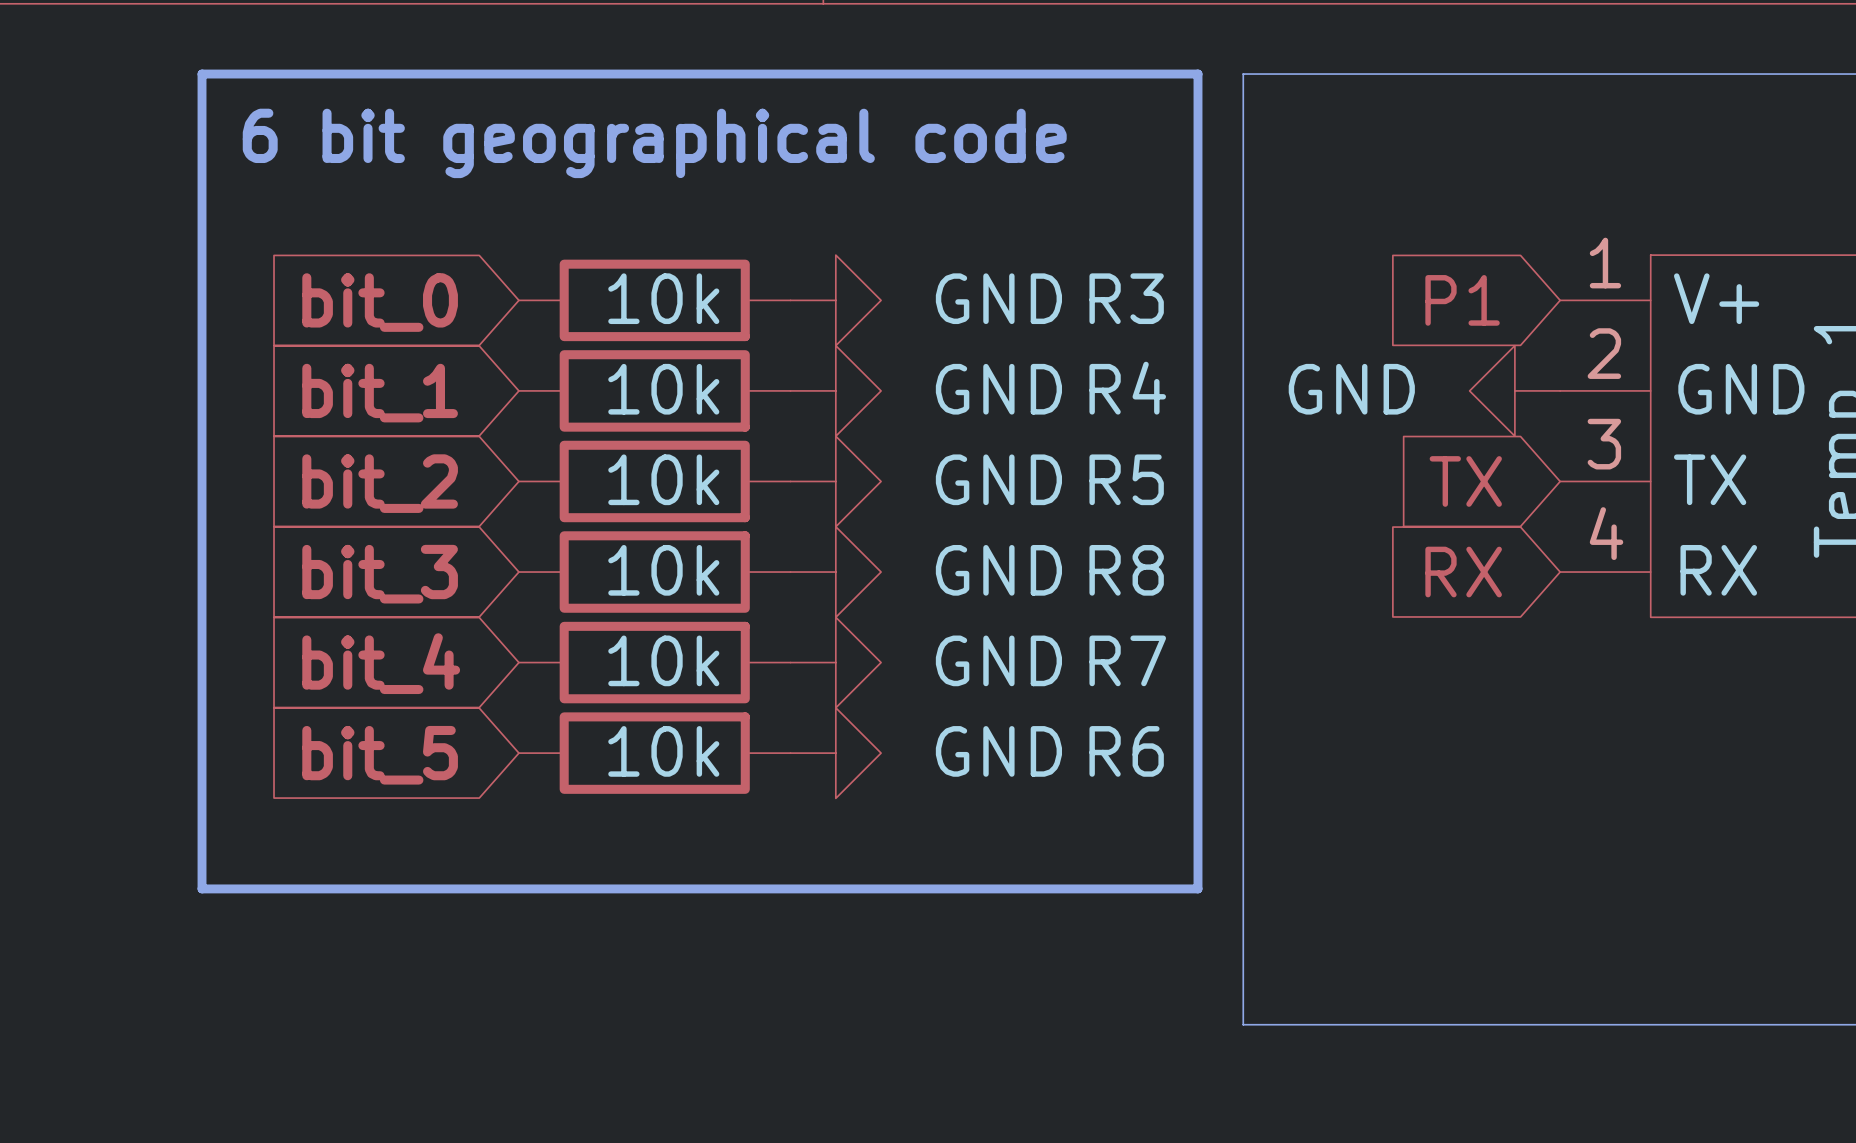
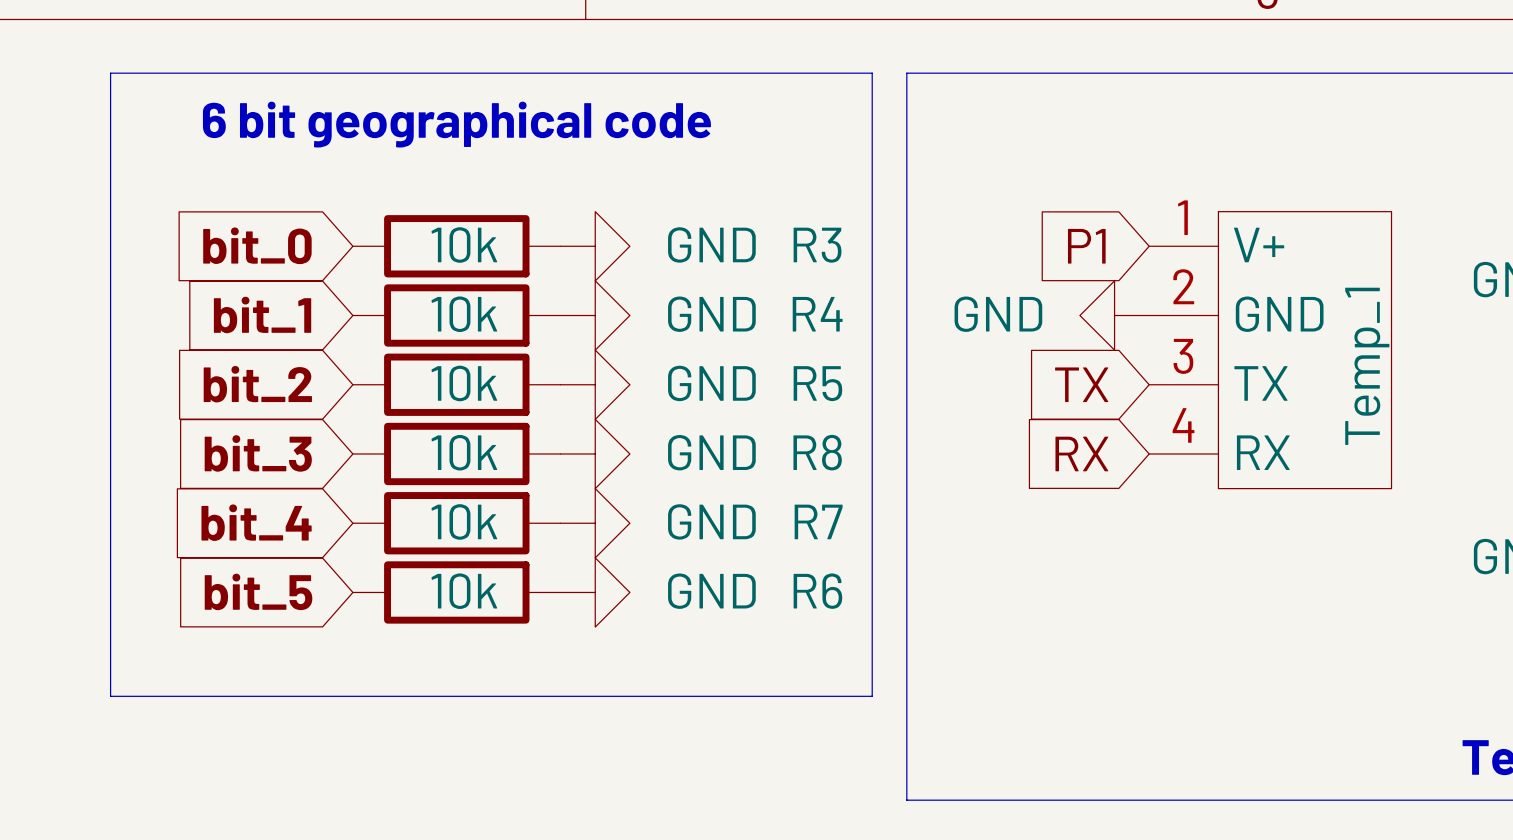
line width: thick (202, 74) (1197, 74) (1197, 888) (202, 888) (202, 74) -> thin (110, 73) (872, 73) (872, 696) (110, 696) (110, 73)

